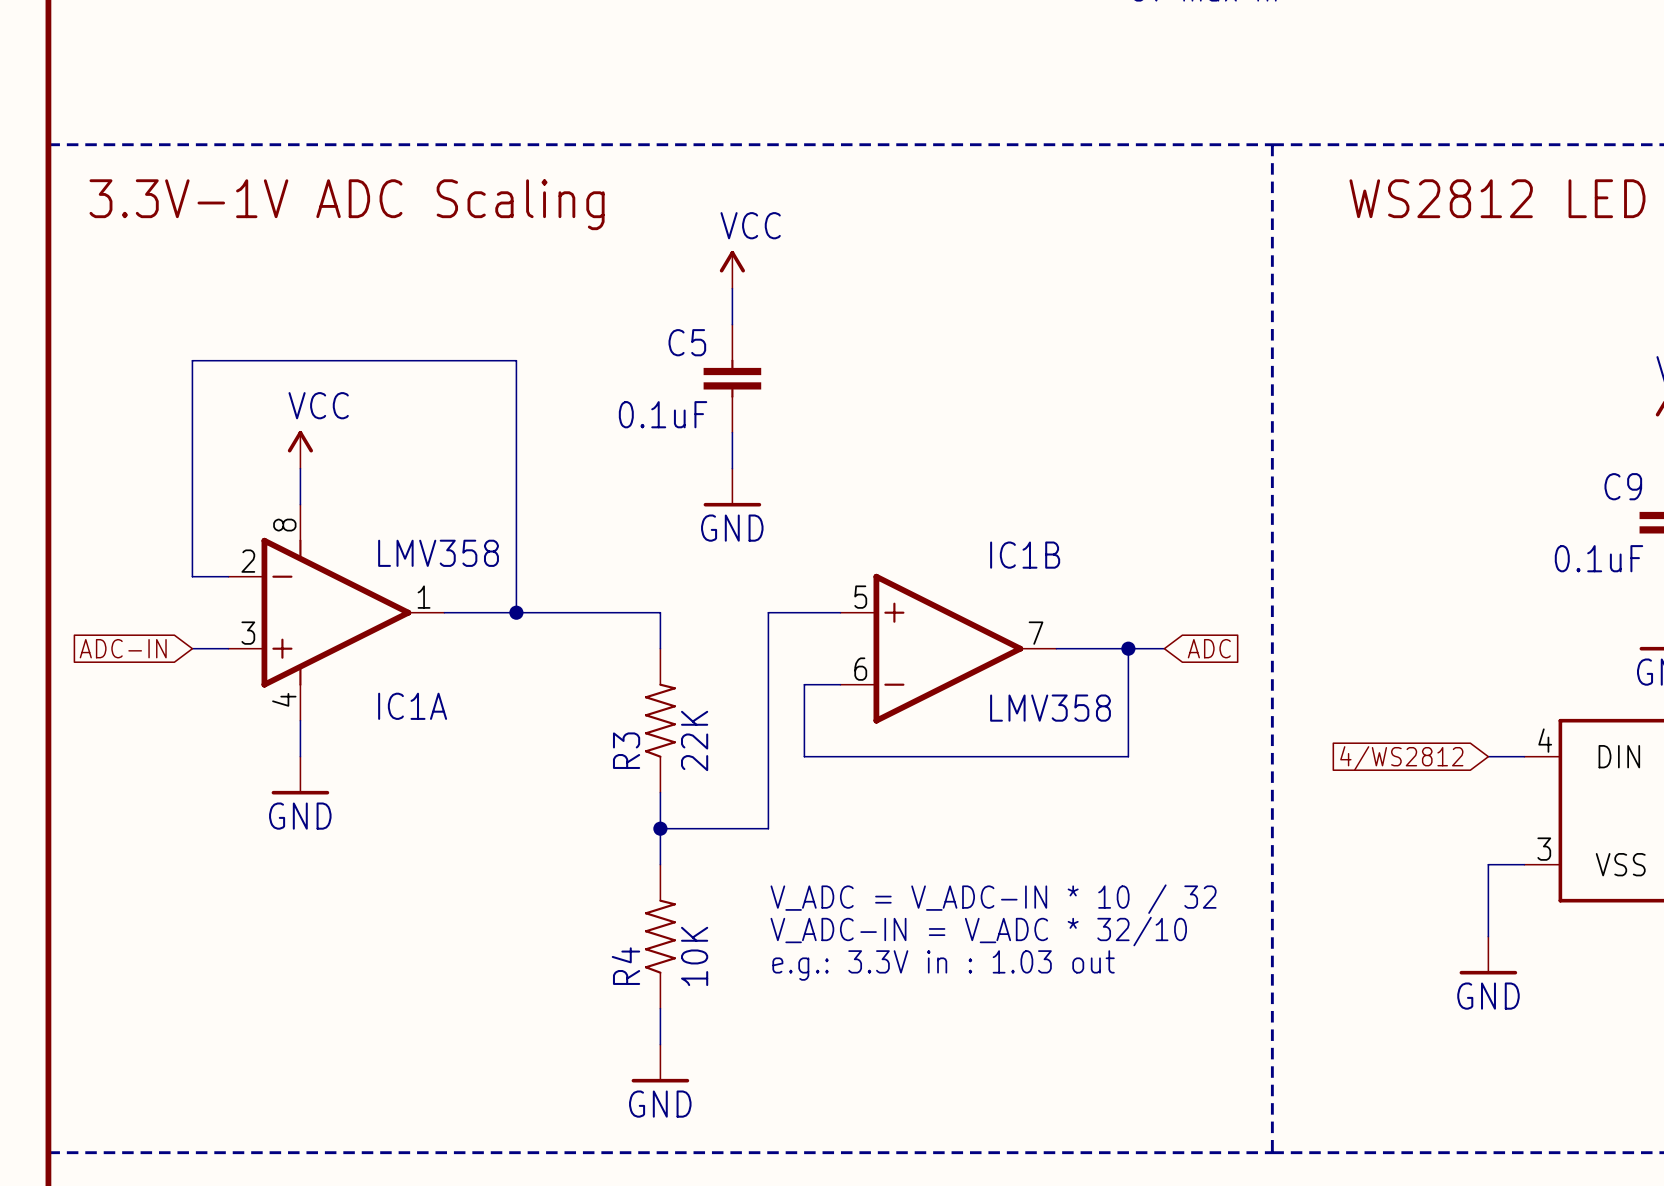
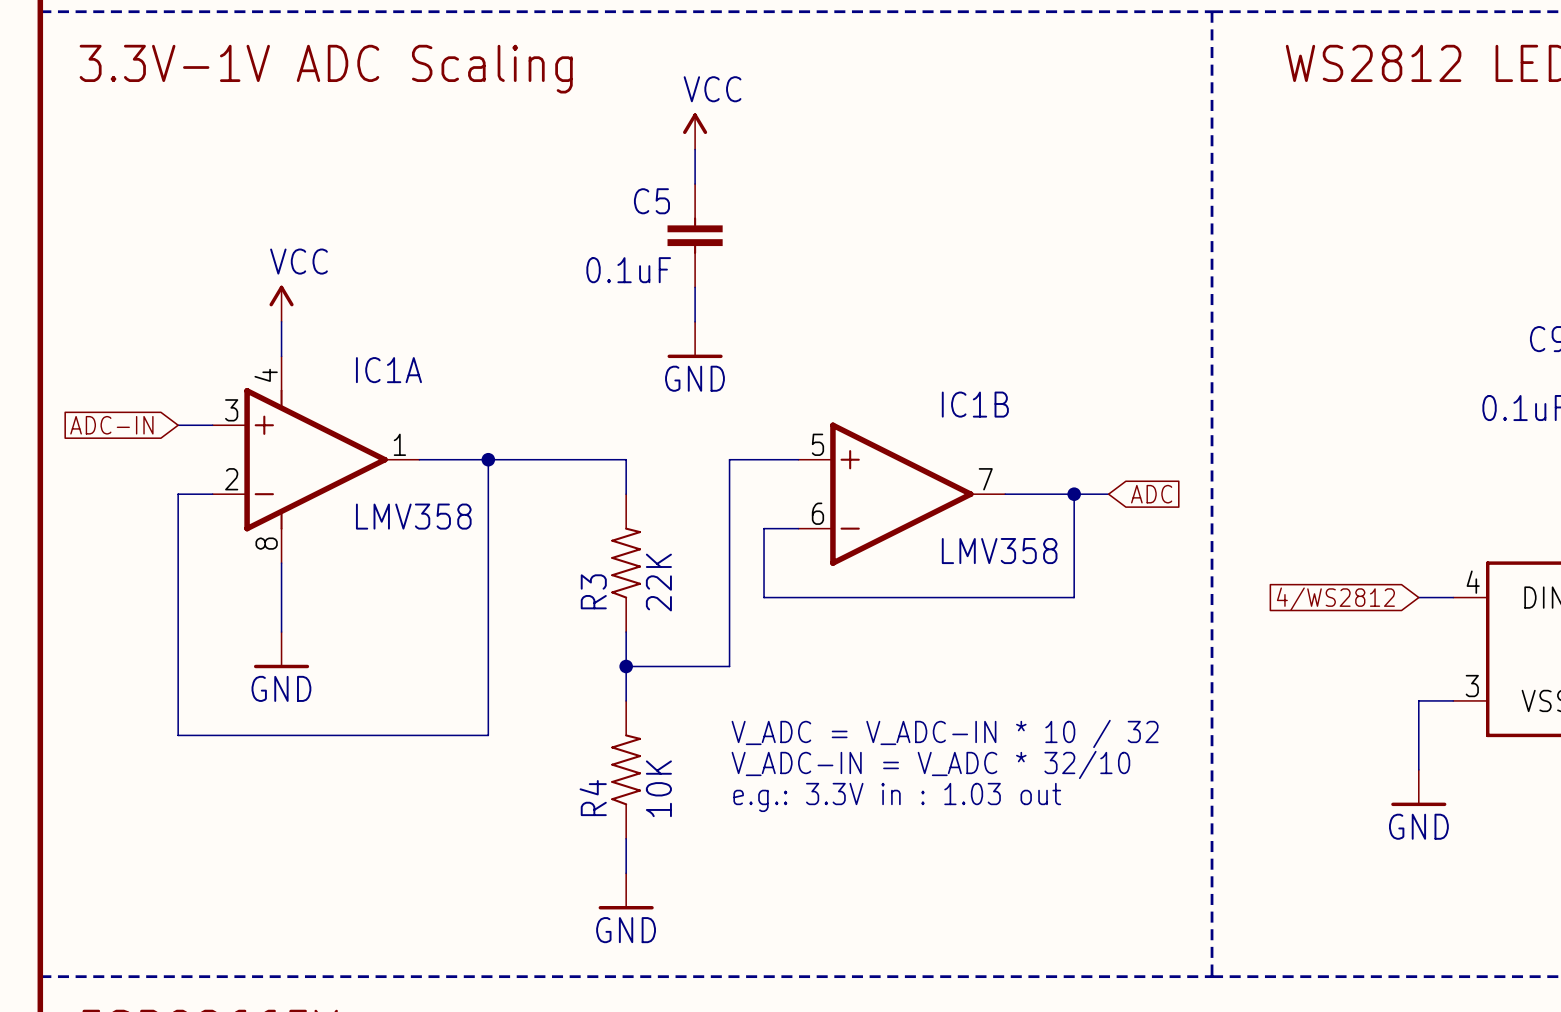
wire: (192, 576) (192, 360) (516, 360) (516, 612) -> (178, 494) (178, 735) (488, 735) (488, 459)
IC1A flip: as is (336, 612) -> up-down (316, 459)
global label position: ADC-IN (123, 648) -> ADC-IN (111, 425)
power symbol position: GND (300, 775) -> GND (281, 650)

